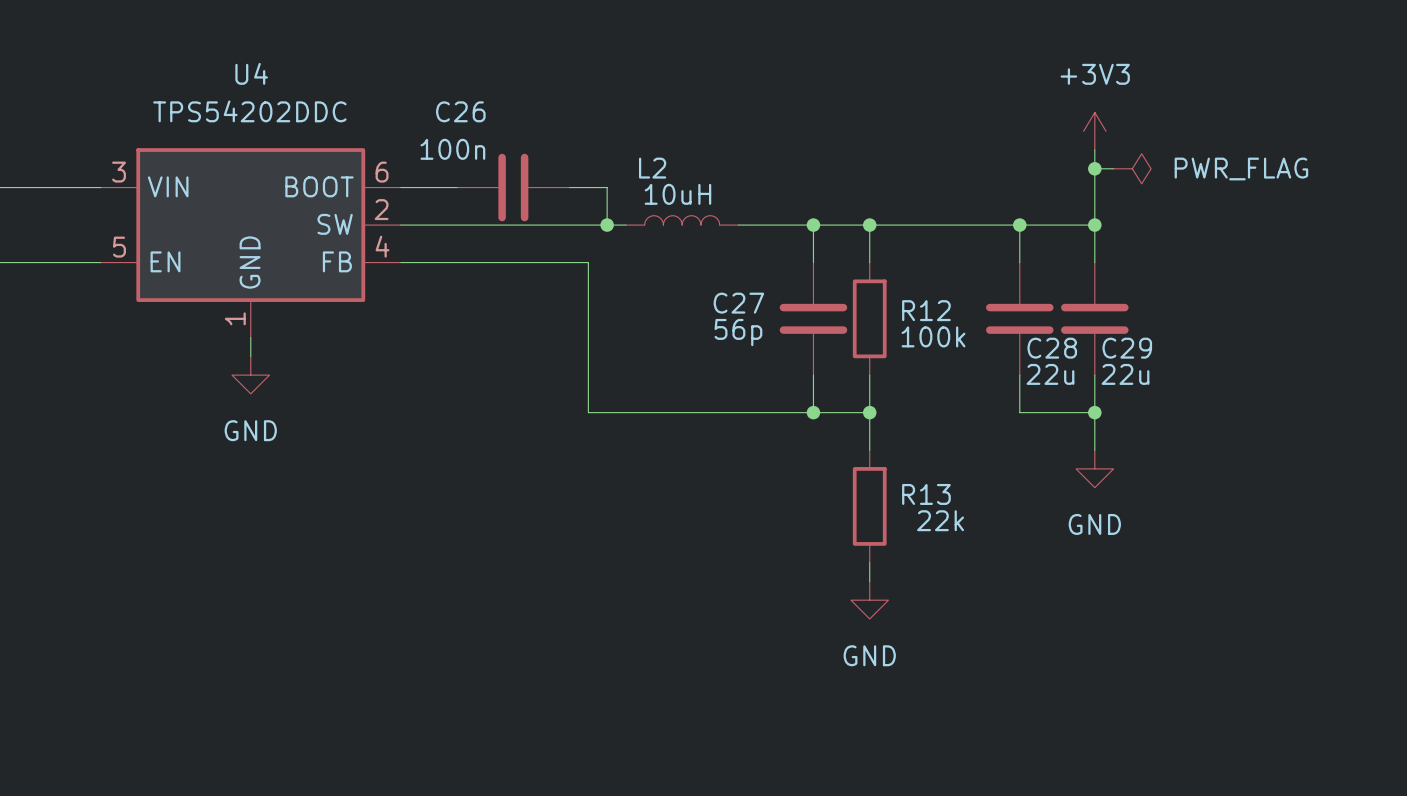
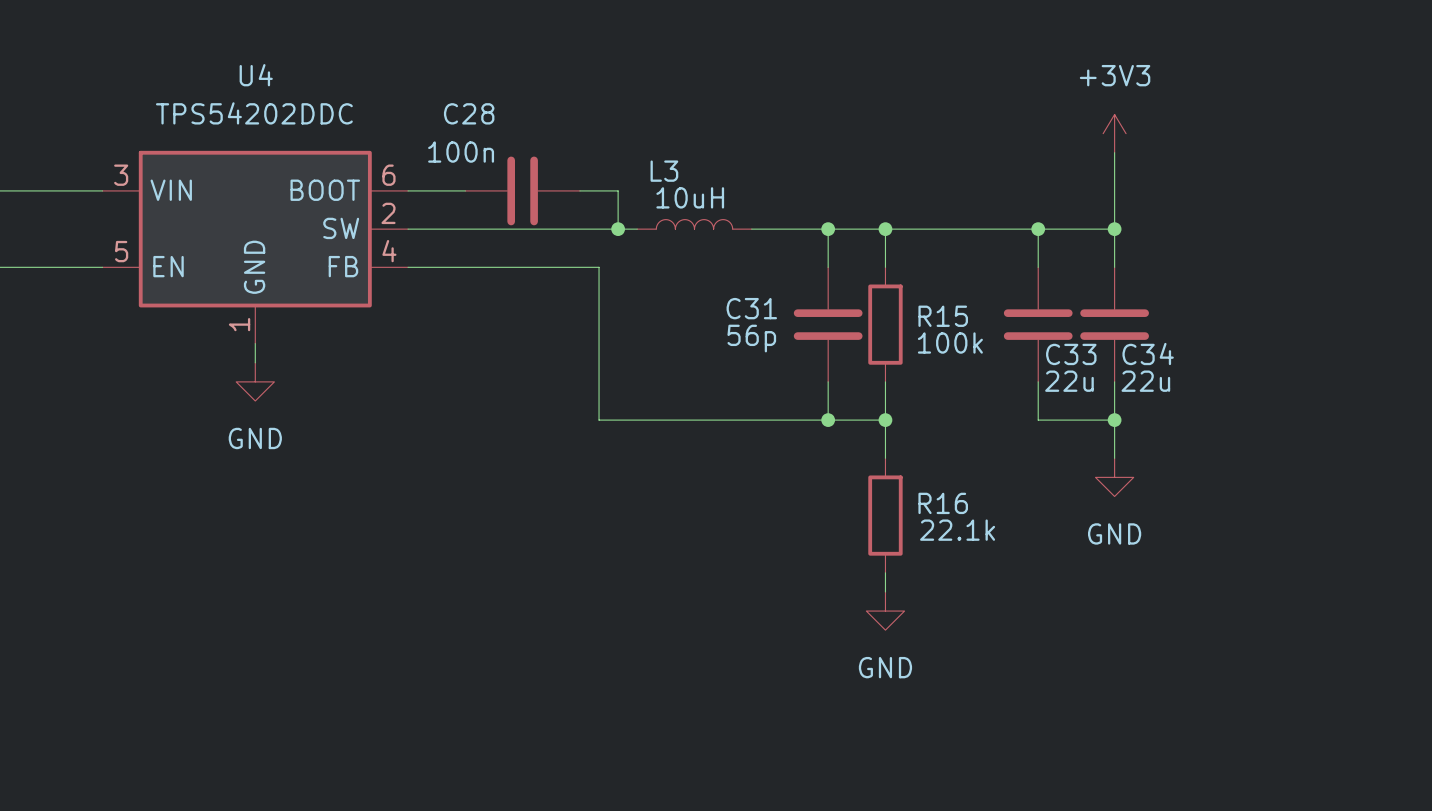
C26 name: C26 (460, 111) -> C28 (469, 113)
L2 name: L2 (652, 168) -> L3 (664, 171)
wire: (1094, 168) (1113, 168) -> none
junction: (1094, 168) -> none
power symbol: PWR_FLAG (1132, 168) -> none
C27 name: C27 (738, 303) -> C31 (751, 308)
R12 name: R12 (926, 310) -> R15 (943, 316)
C28 name: C28 (1052, 348) -> C33 (1071, 354)
C29 name: C29 (1127, 348) -> C34 (1148, 353)
R13 name: R13 (926, 494) -> R16 (943, 503)
R13 value: 22k (940, 520) -> 22.1k (957, 530)

